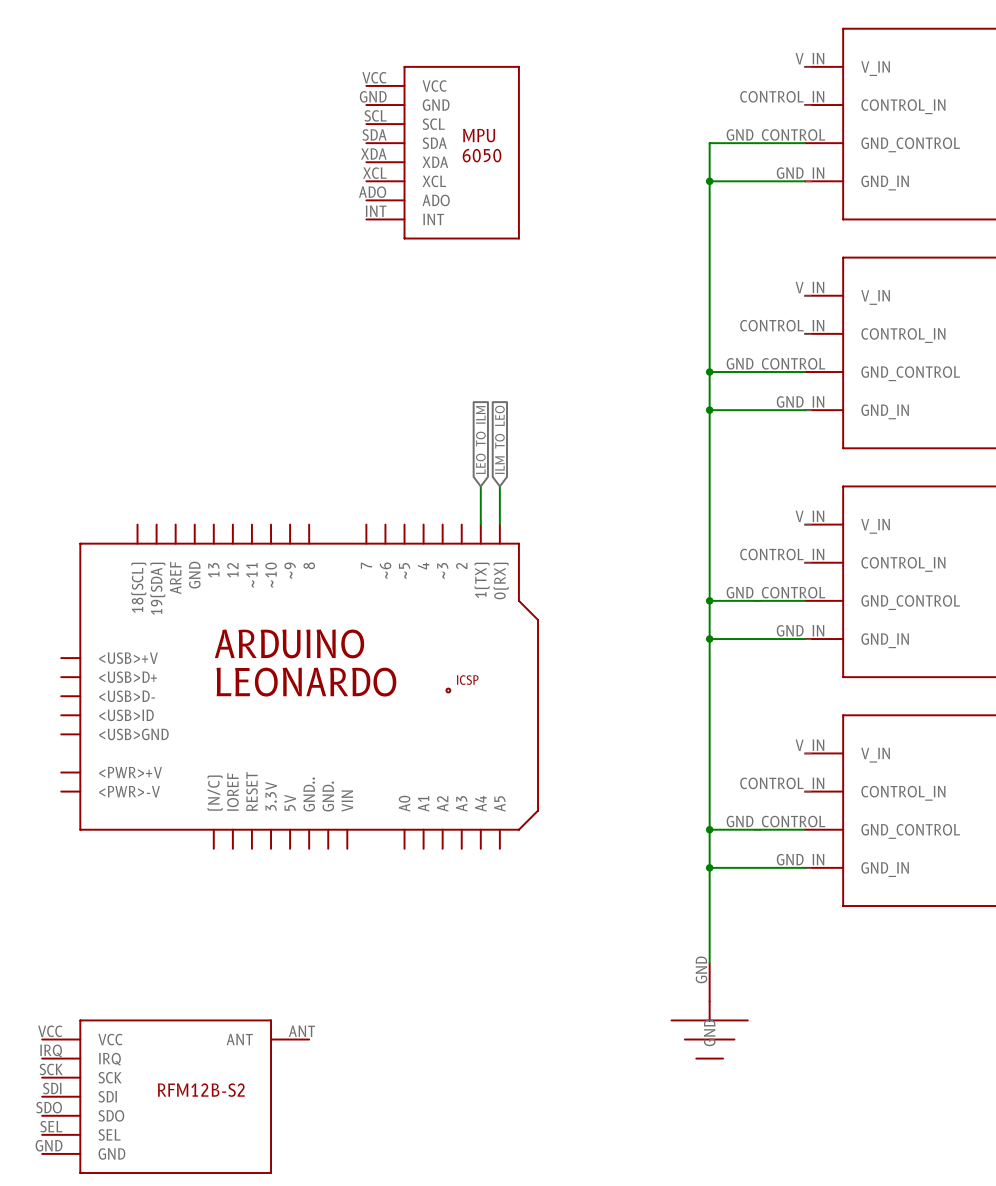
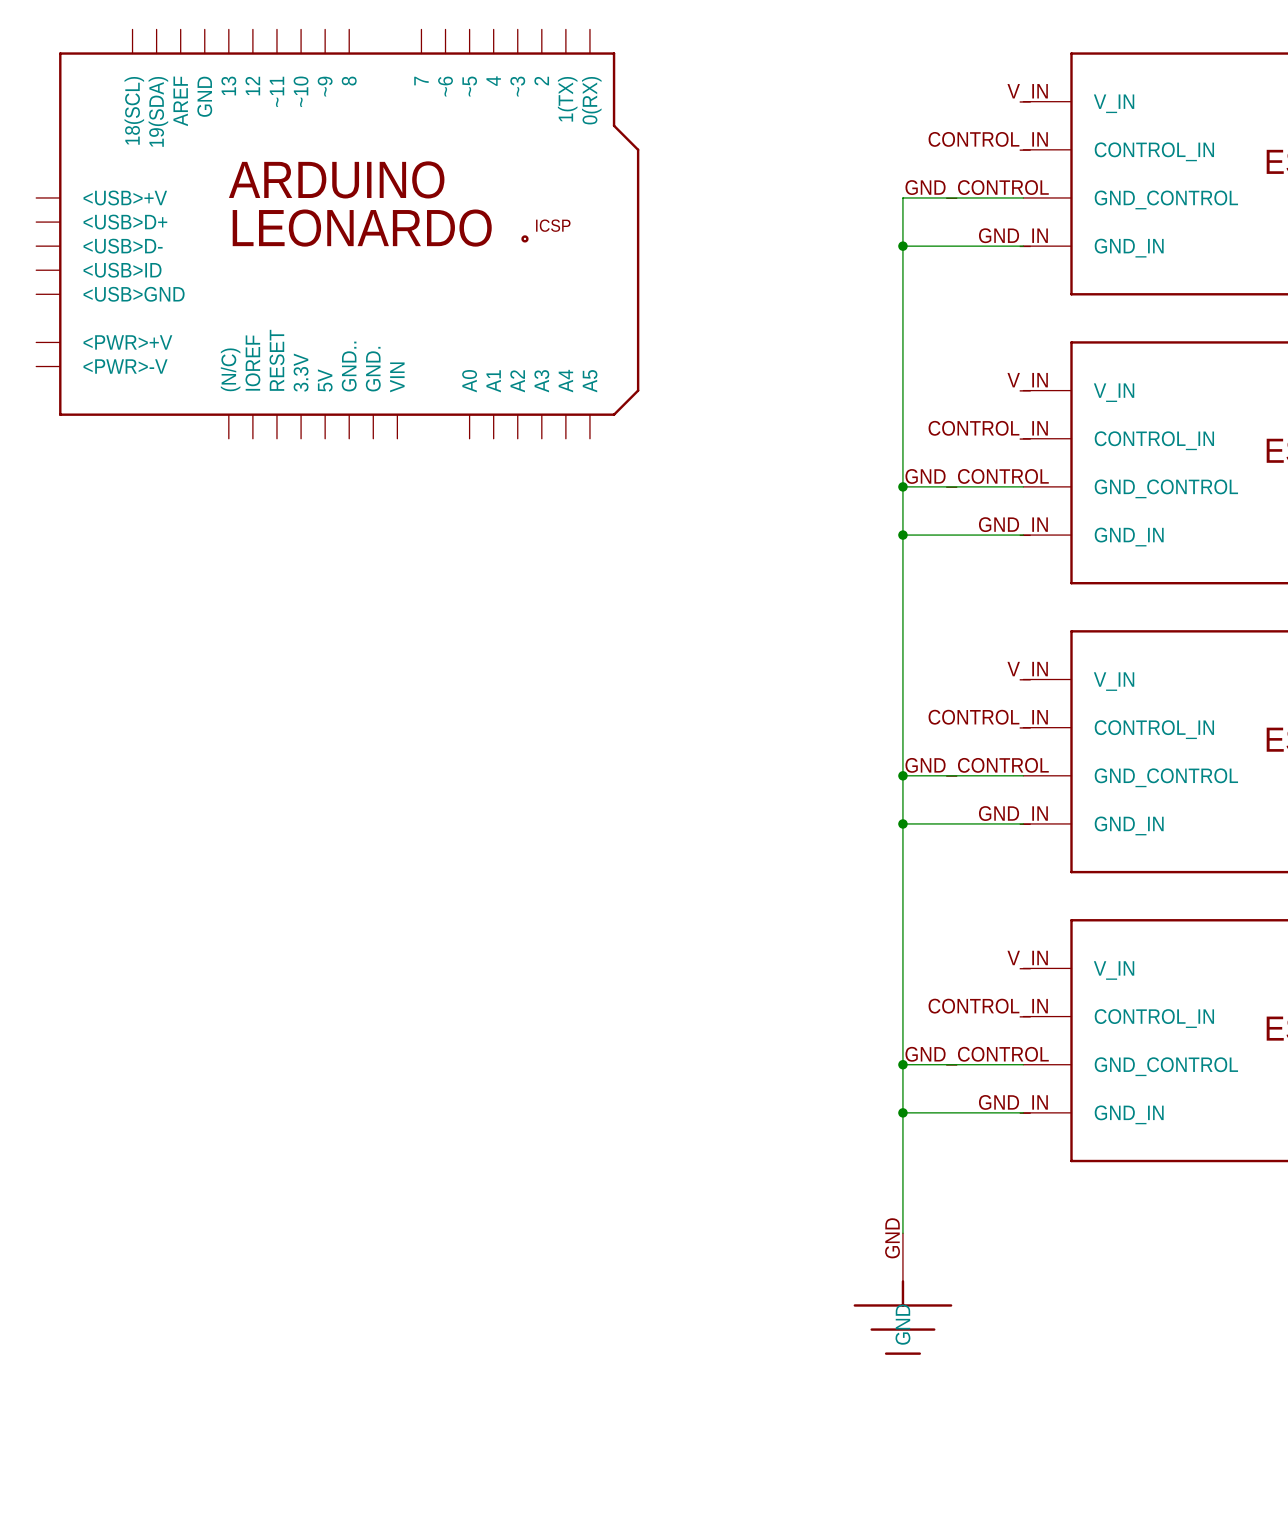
part: (443, 152) -> none
part: none -> (337, 234)
global label: ILM_TO_LEO (501, 439) -> none
global label: LEO_TO_ILM (482, 440) -> none
wire: (480, 486) (480, 524) -> none
wire: (499, 486) (499, 524) -> none
part: (300, 686) -> none
part: (175, 1096) -> none

